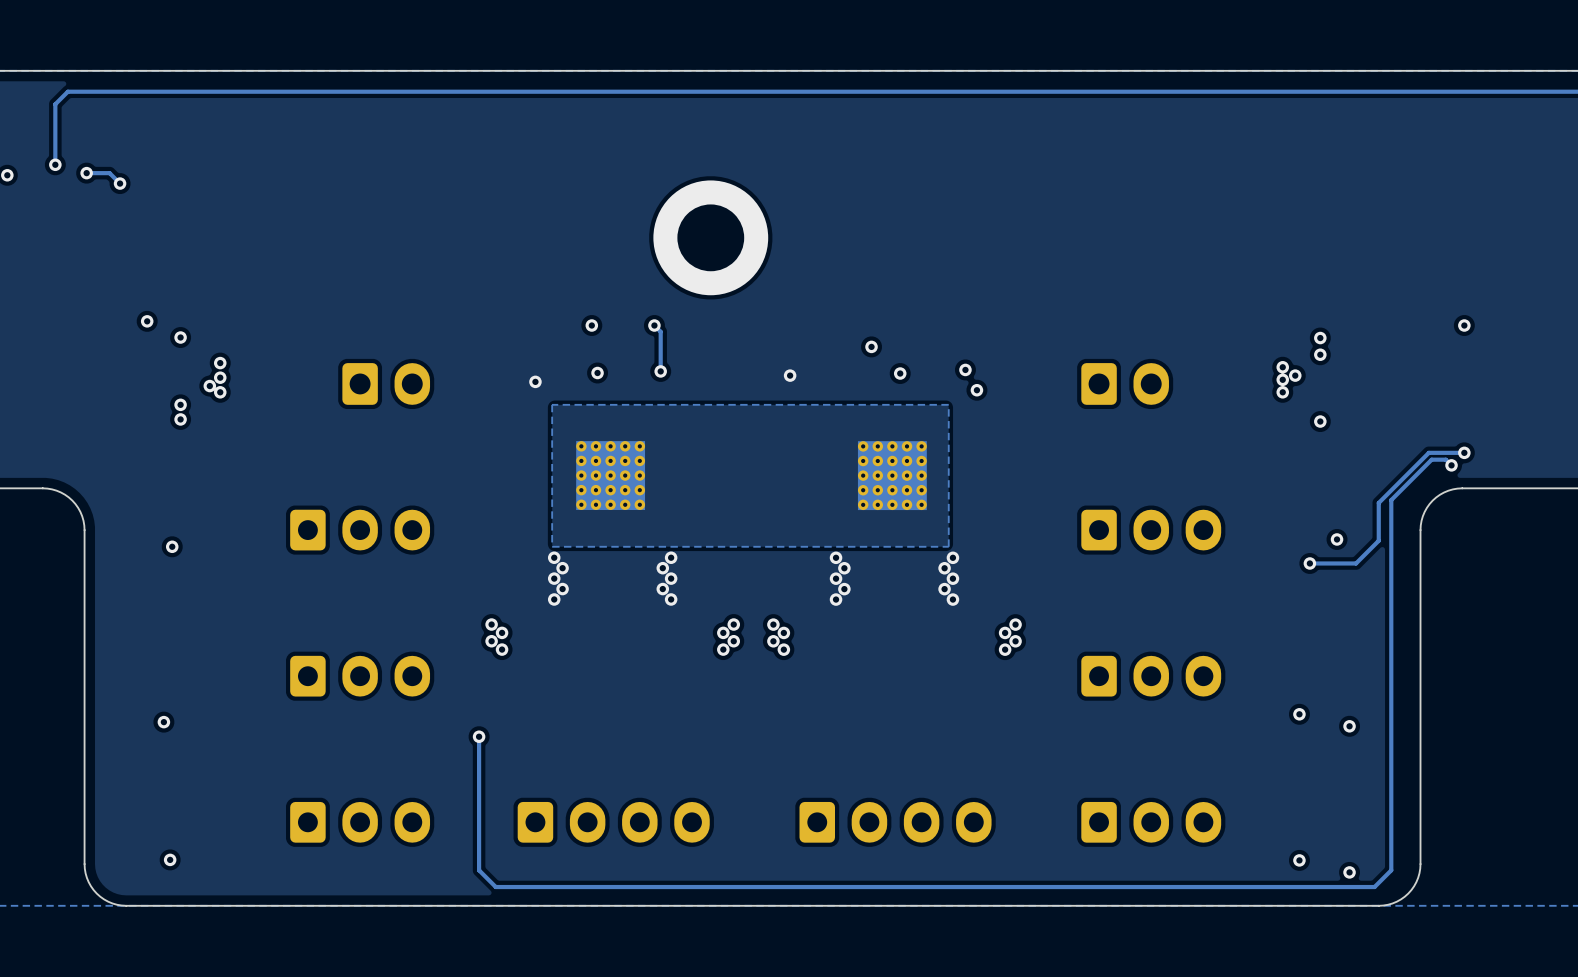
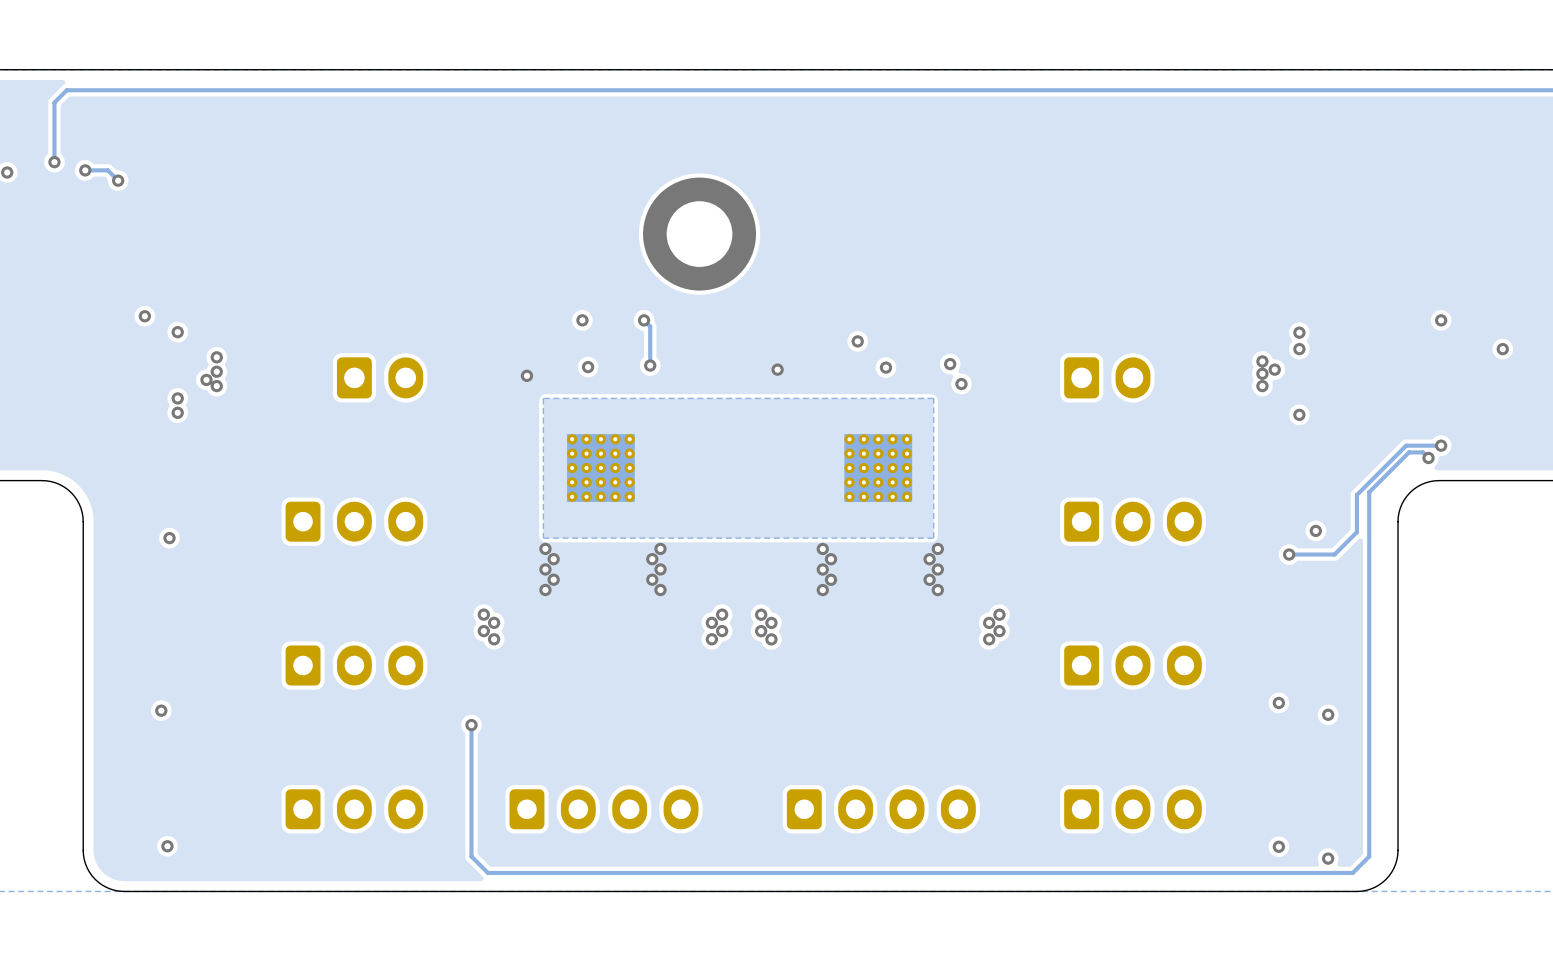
via: none -> (1502, 349)

